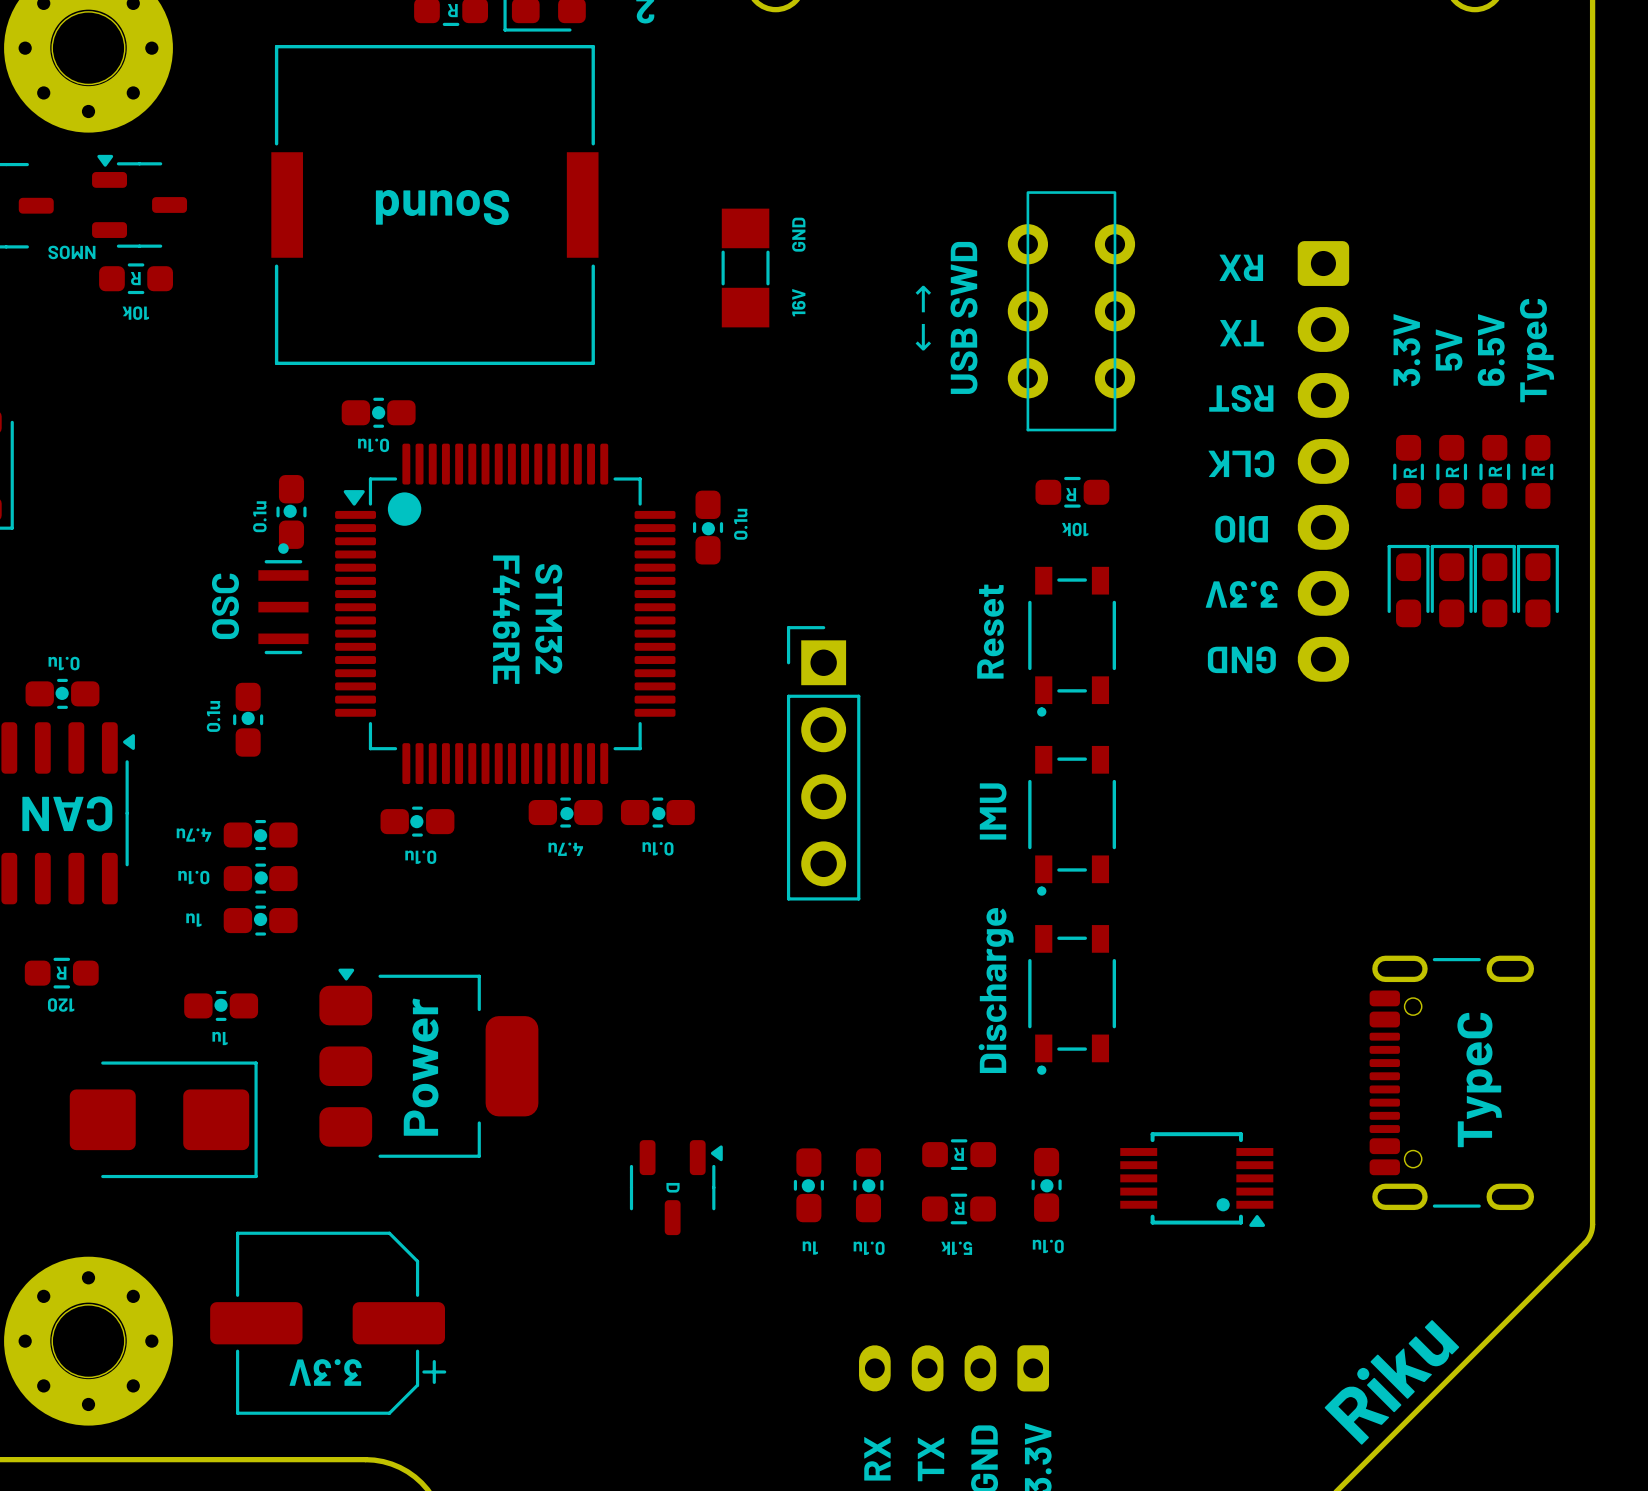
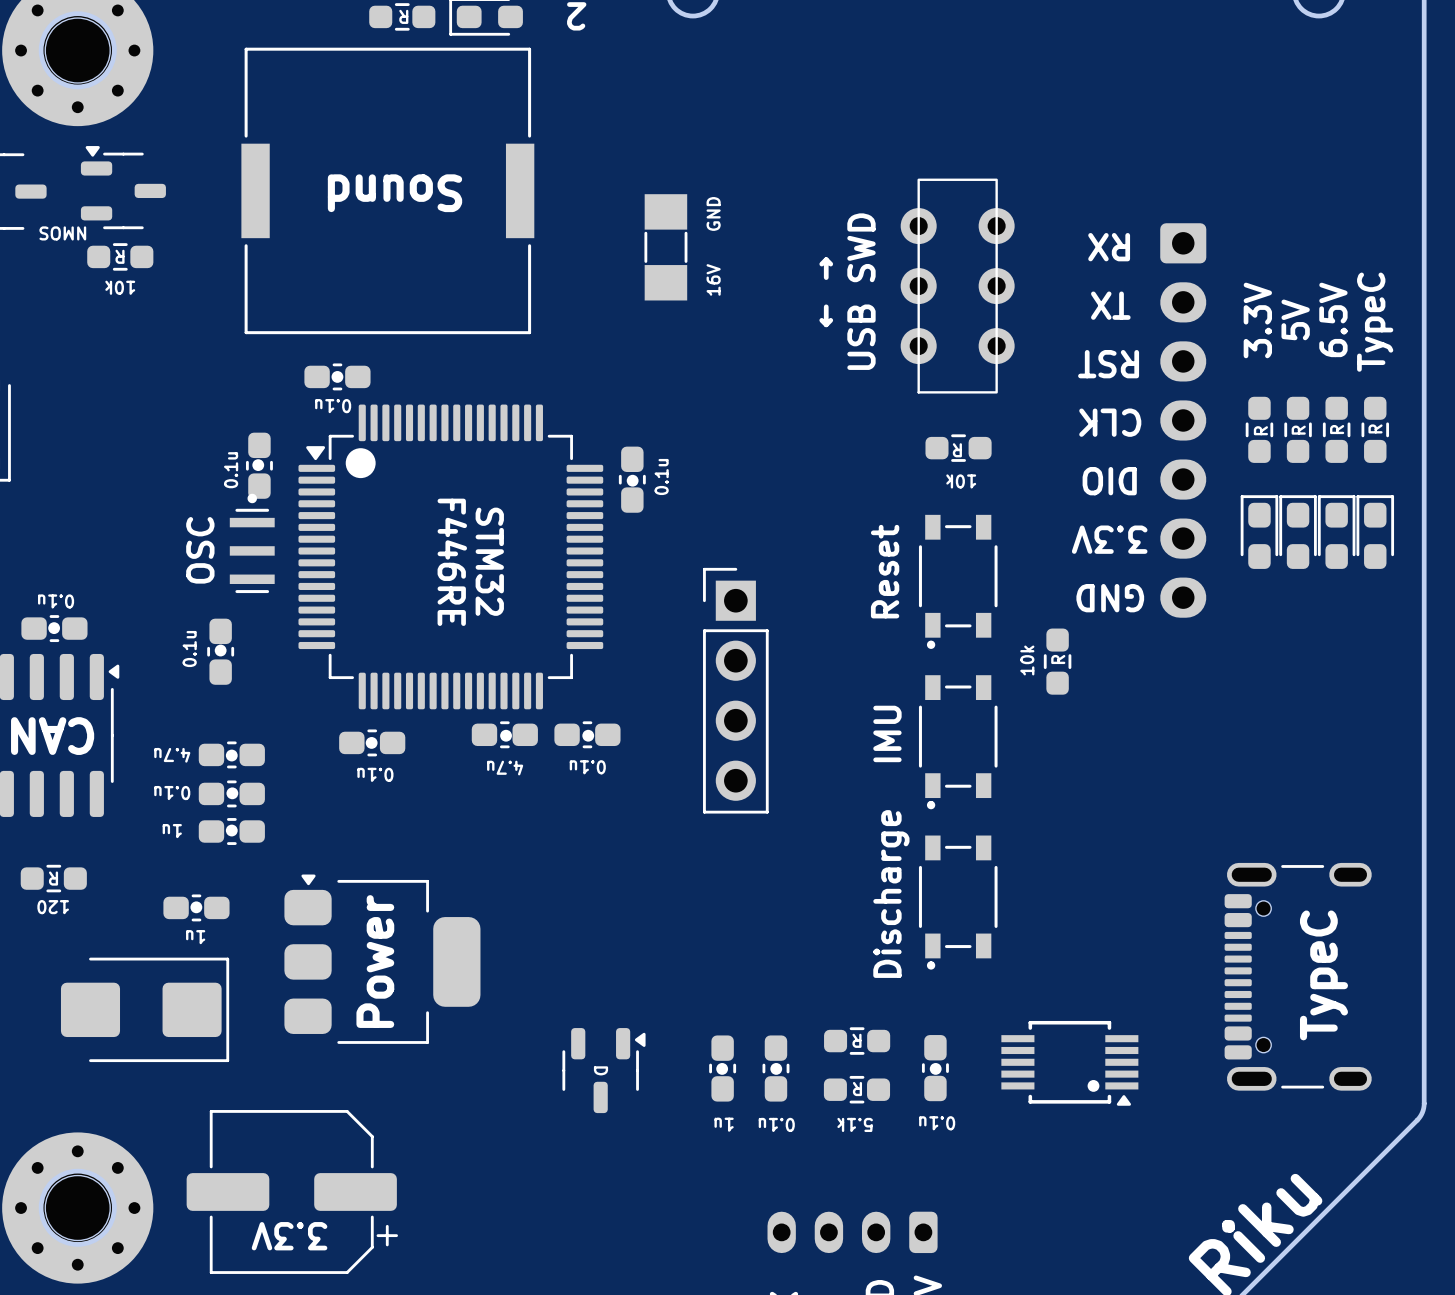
text: none -> R (1058, 659)
text: none -> 10k (1027, 660)
part: none -> (1057, 661)

